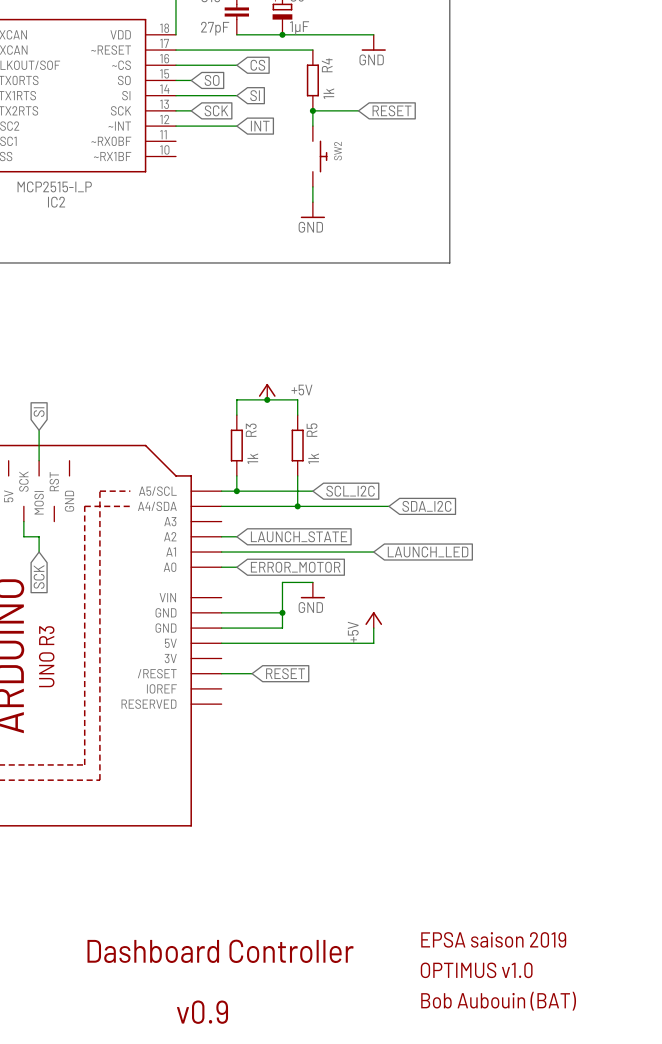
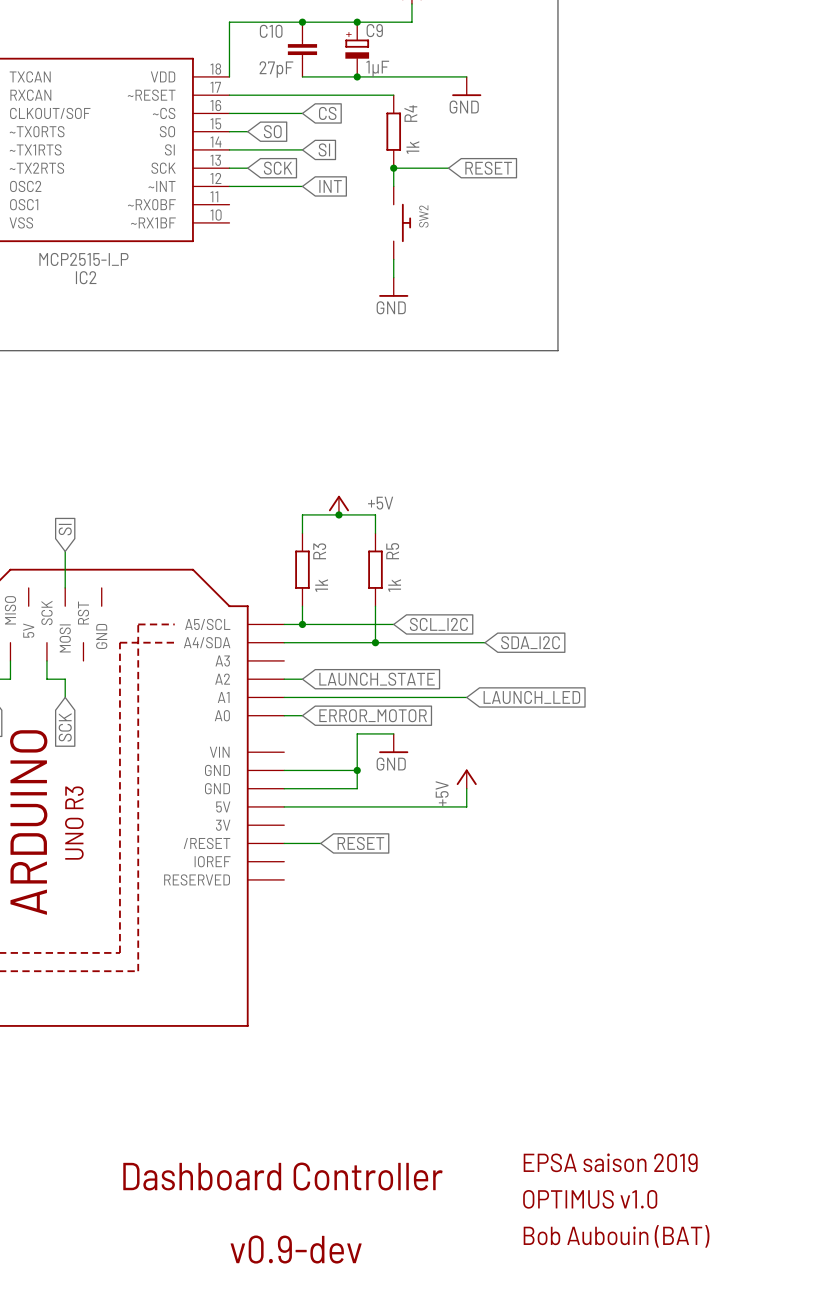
text: v0.9 (202, 1012) -> v0.9-dev (296, 1249)

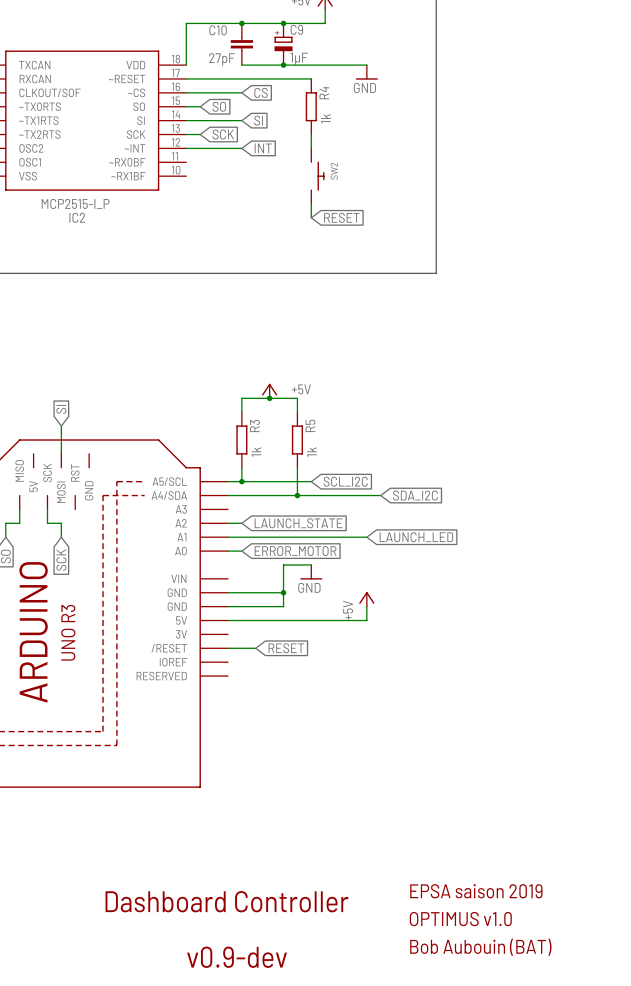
wire: (393, 168) (448, 168) -> none
junction: (393, 168) -> none
global label position: RESET (488, 168) -> RESET (341, 217)
power symbol: GND (393, 287) -> none

